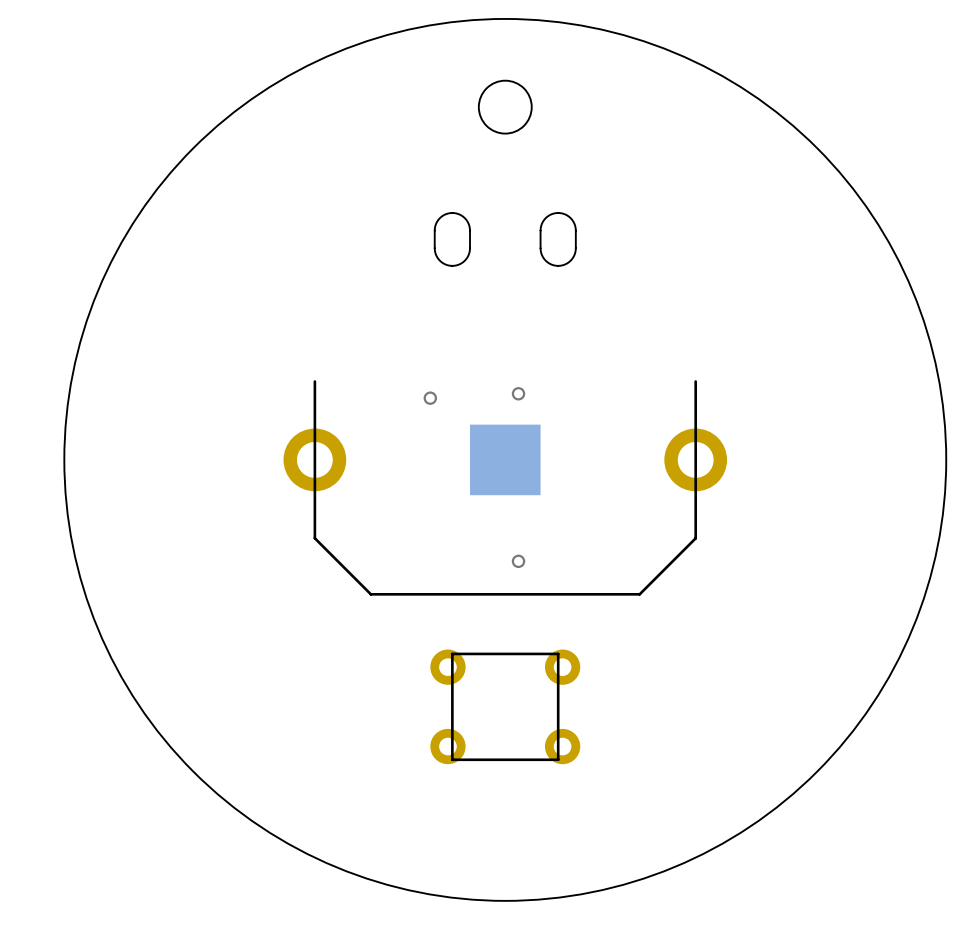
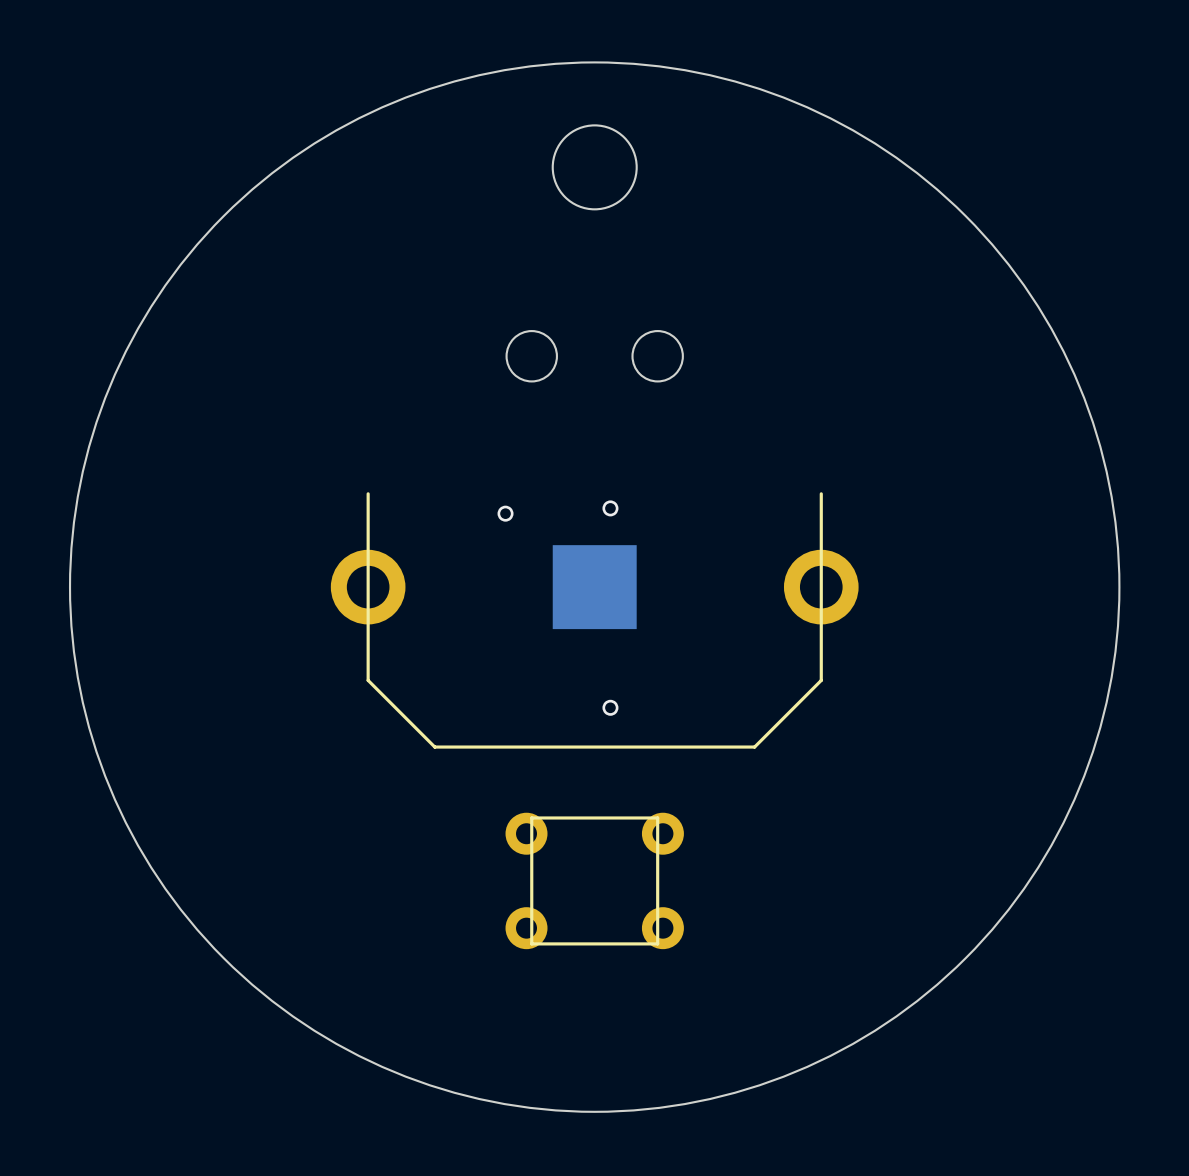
round board edge size: [477, 79, 533, 135] -> [551, 124, 638, 211]
board edge: (452, 212) (439, 218) (434, 230) (434, 250) (437, 257) (443, 263) (452, 265) (464, 260) (470, 248) (469, 228) (467, 221) (461, 215) (452, 212) -> none
board edge: (558, 212) (545, 218) (540, 230) (540, 250) (542, 257) (549, 263) (558, 265) (570, 260) (575, 248) (575, 228) (573, 221) (567, 215) (558, 212) -> none
round board edge: none -> [505, 330, 558, 383]
round board edge: none -> [631, 330, 684, 383]

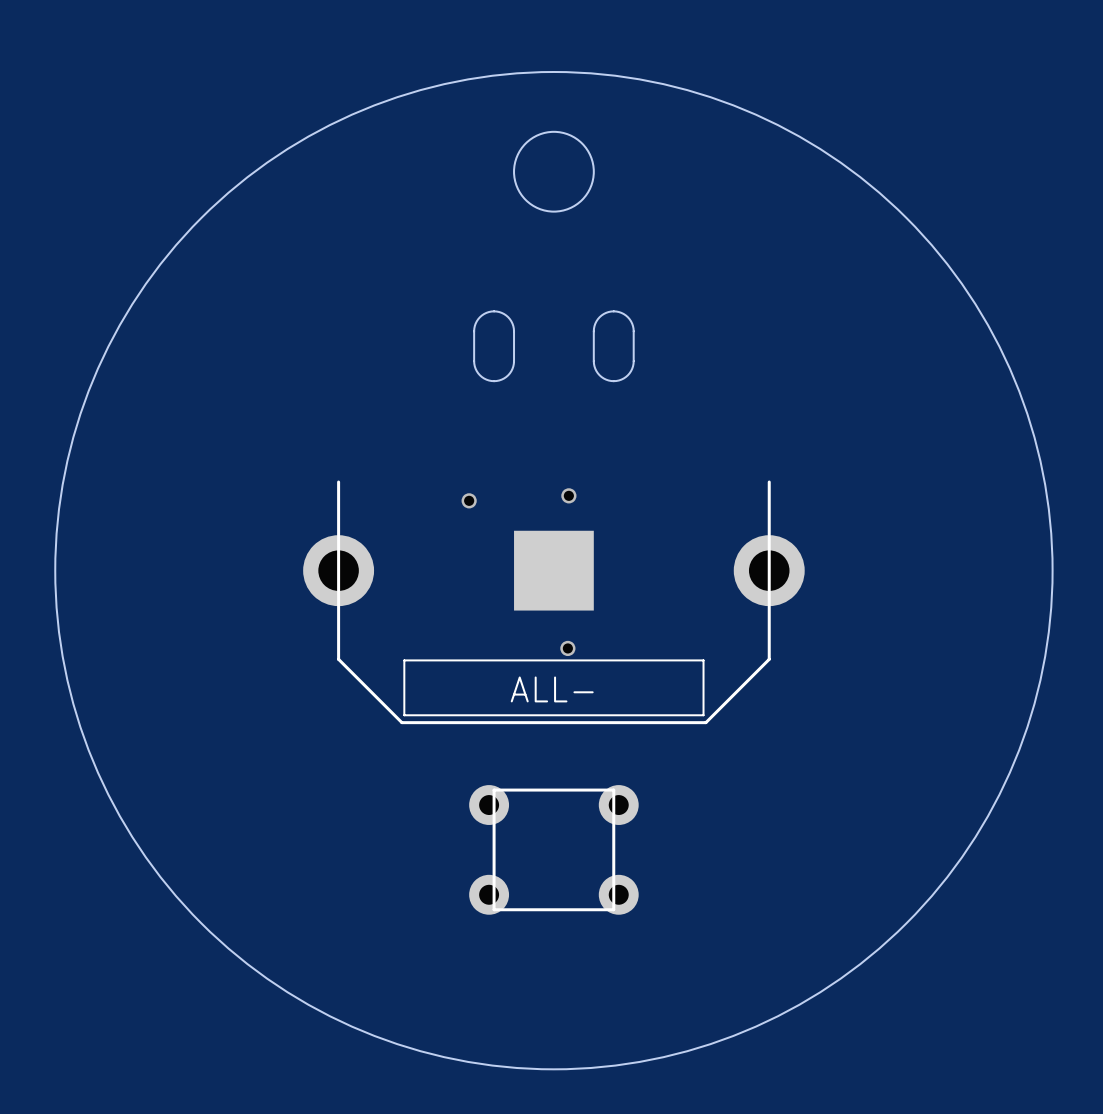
board edge: none -> (494, 311) (501, 312) (508, 317) (512, 323) (514, 331) (512, 368) (506, 377) (494, 381) (486, 379) (479, 375) (475, 368) (474, 361) (475, 323) (481, 315) (494, 311)
board edge: none -> (613, 311) (621, 312) (627, 317) (632, 323) (633, 331) (632, 368) (625, 377) (613, 381) (606, 379) (599, 375) (595, 368) (593, 361) (595, 323) (601, 315) (613, 311)
round board edge: [505, 330, 558, 383] -> none
round board edge: [631, 330, 684, 383] -> none
line: none -> (703, 660) (703, 715) (404, 715) (404, 660) (703, 660)
via position: (610, 707) -> (567, 648)
text: none -> ALL- (552, 689)

